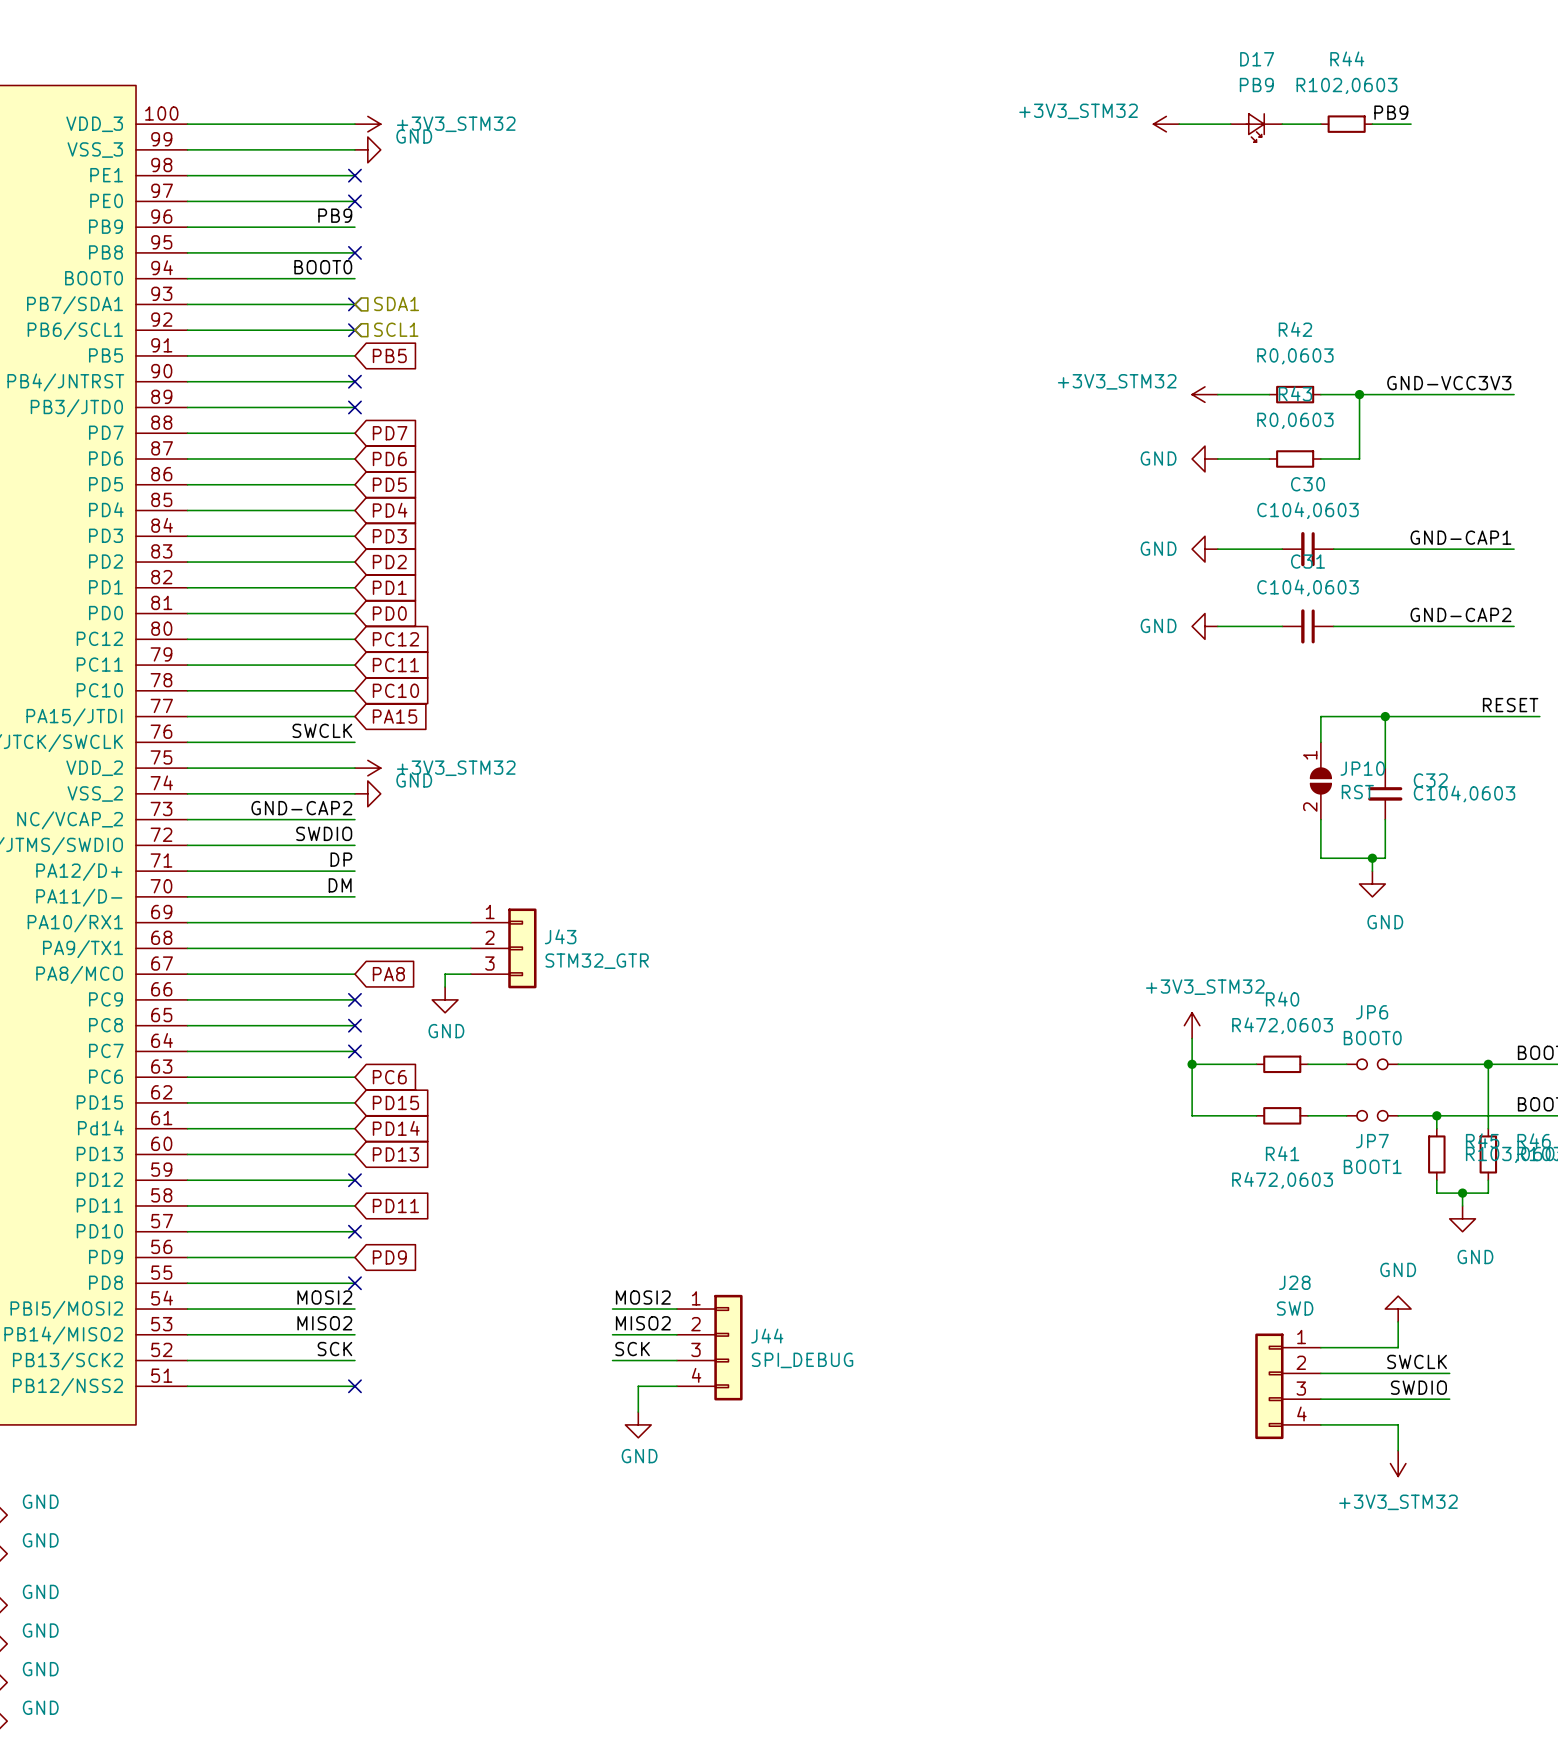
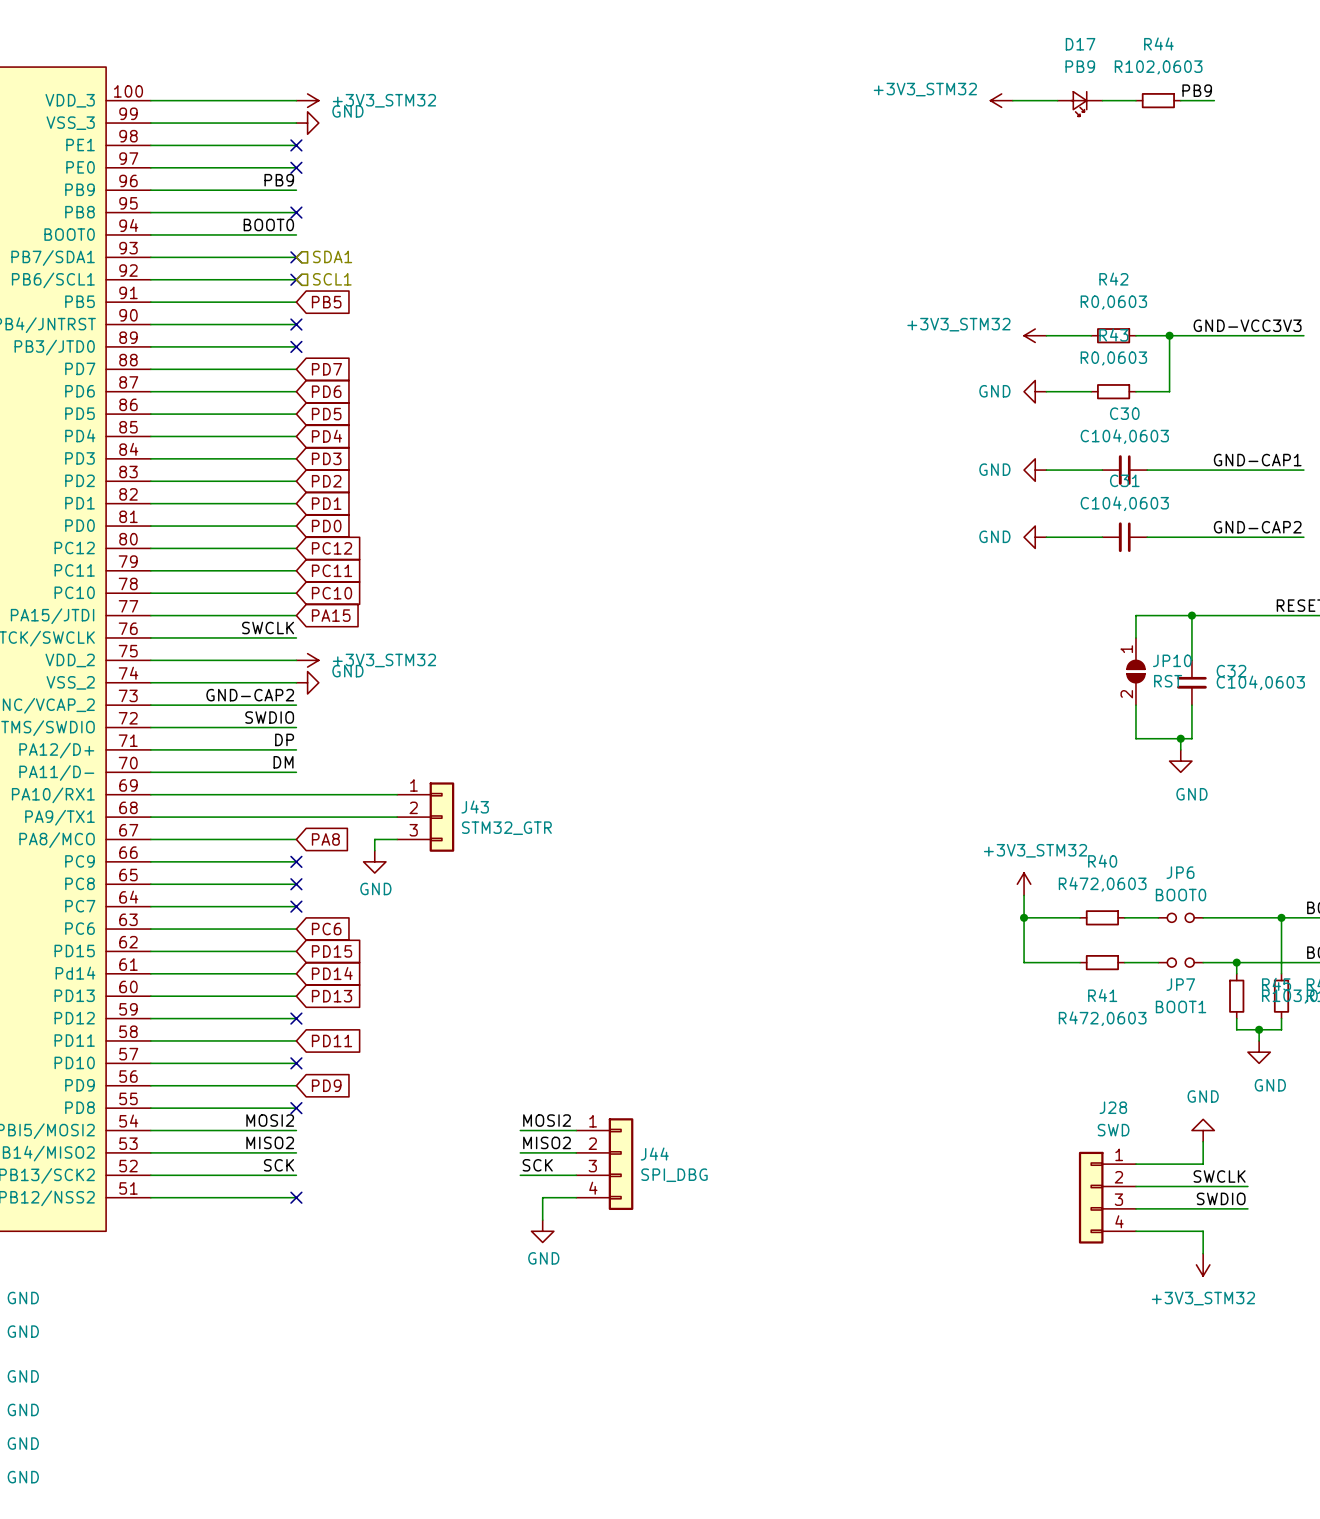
J44 value: SPI_DEBUG (802, 1360) -> SPI_DBG (674, 1175)

